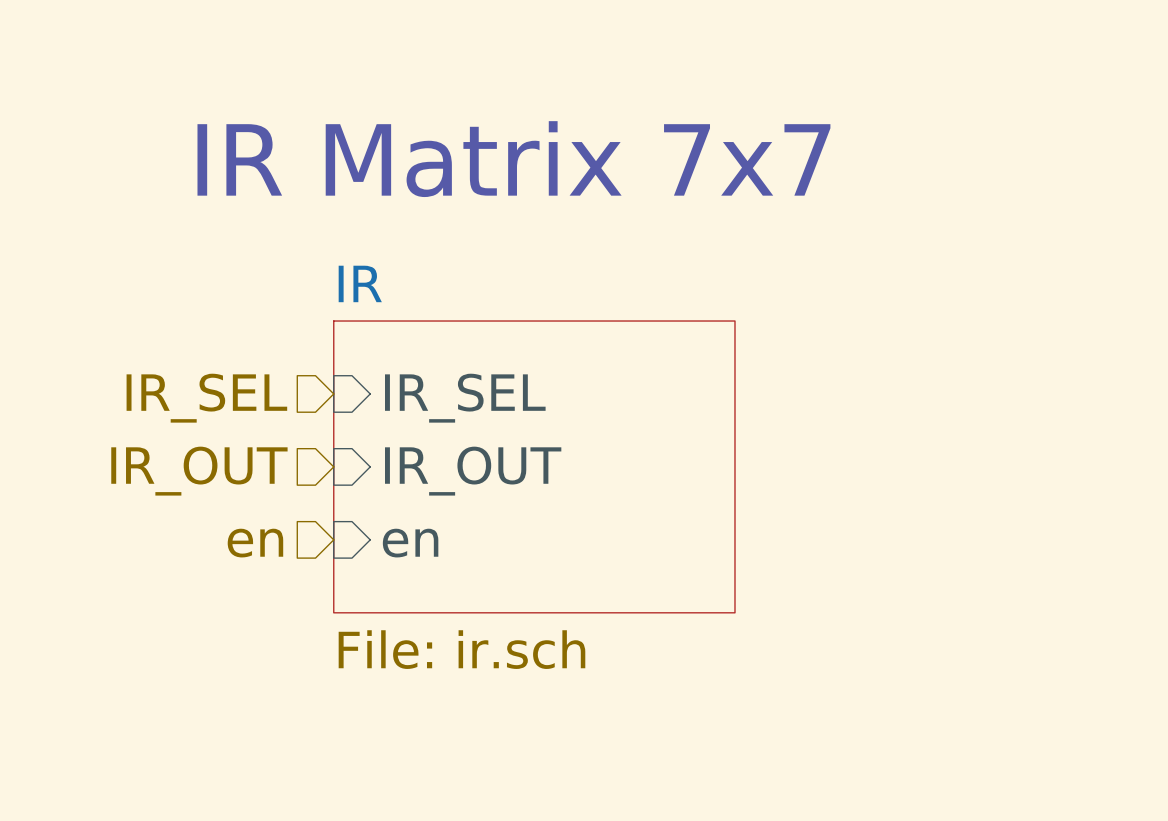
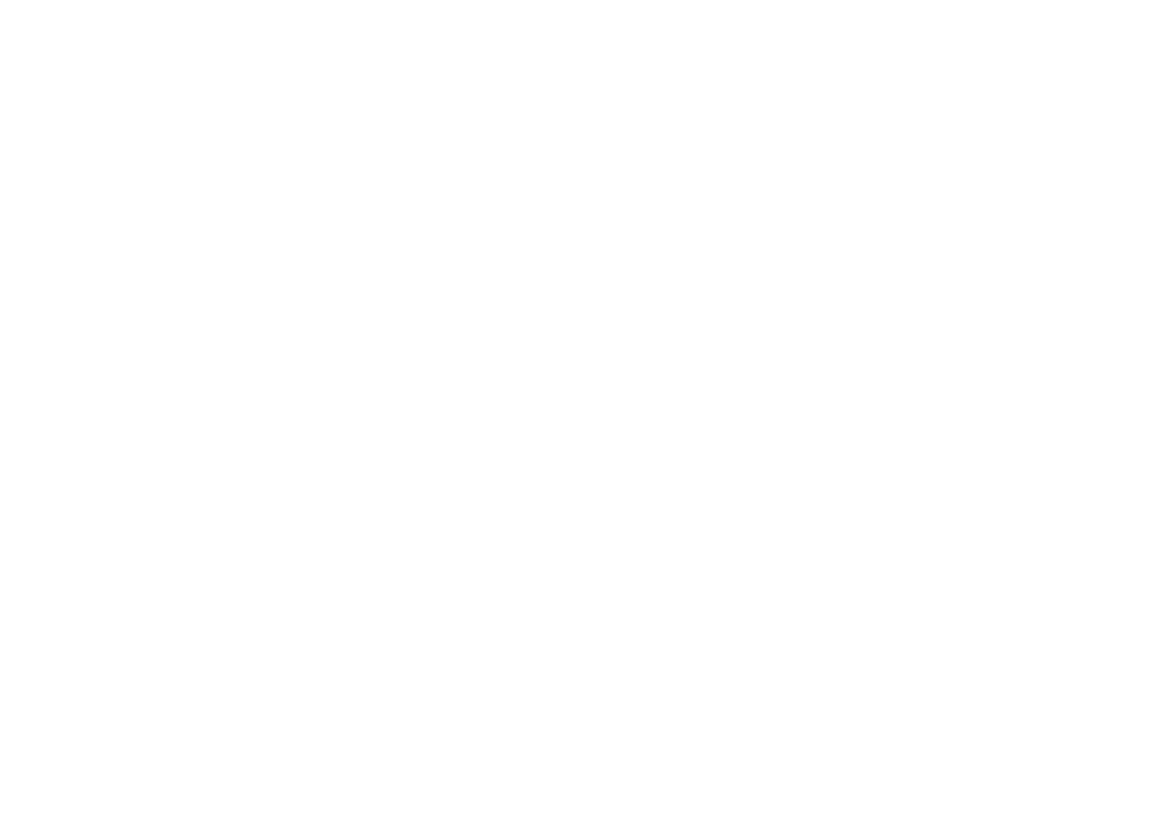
text: IR Matrix 7x7 (513, 159) -> none
hierarchical label: IR_SEL (206, 398) -> none
sheet pin: IR_SEL (465, 398) -> none
sheet IR: File: ir.sch (534, 466) -> none
hierarchical label: IR_OUT (199, 471) -> none
sheet pin: IR_OUT (473, 471) -> none
hierarchical label: en (255, 543) -> none
sheet pin: en (410, 543) -> none

